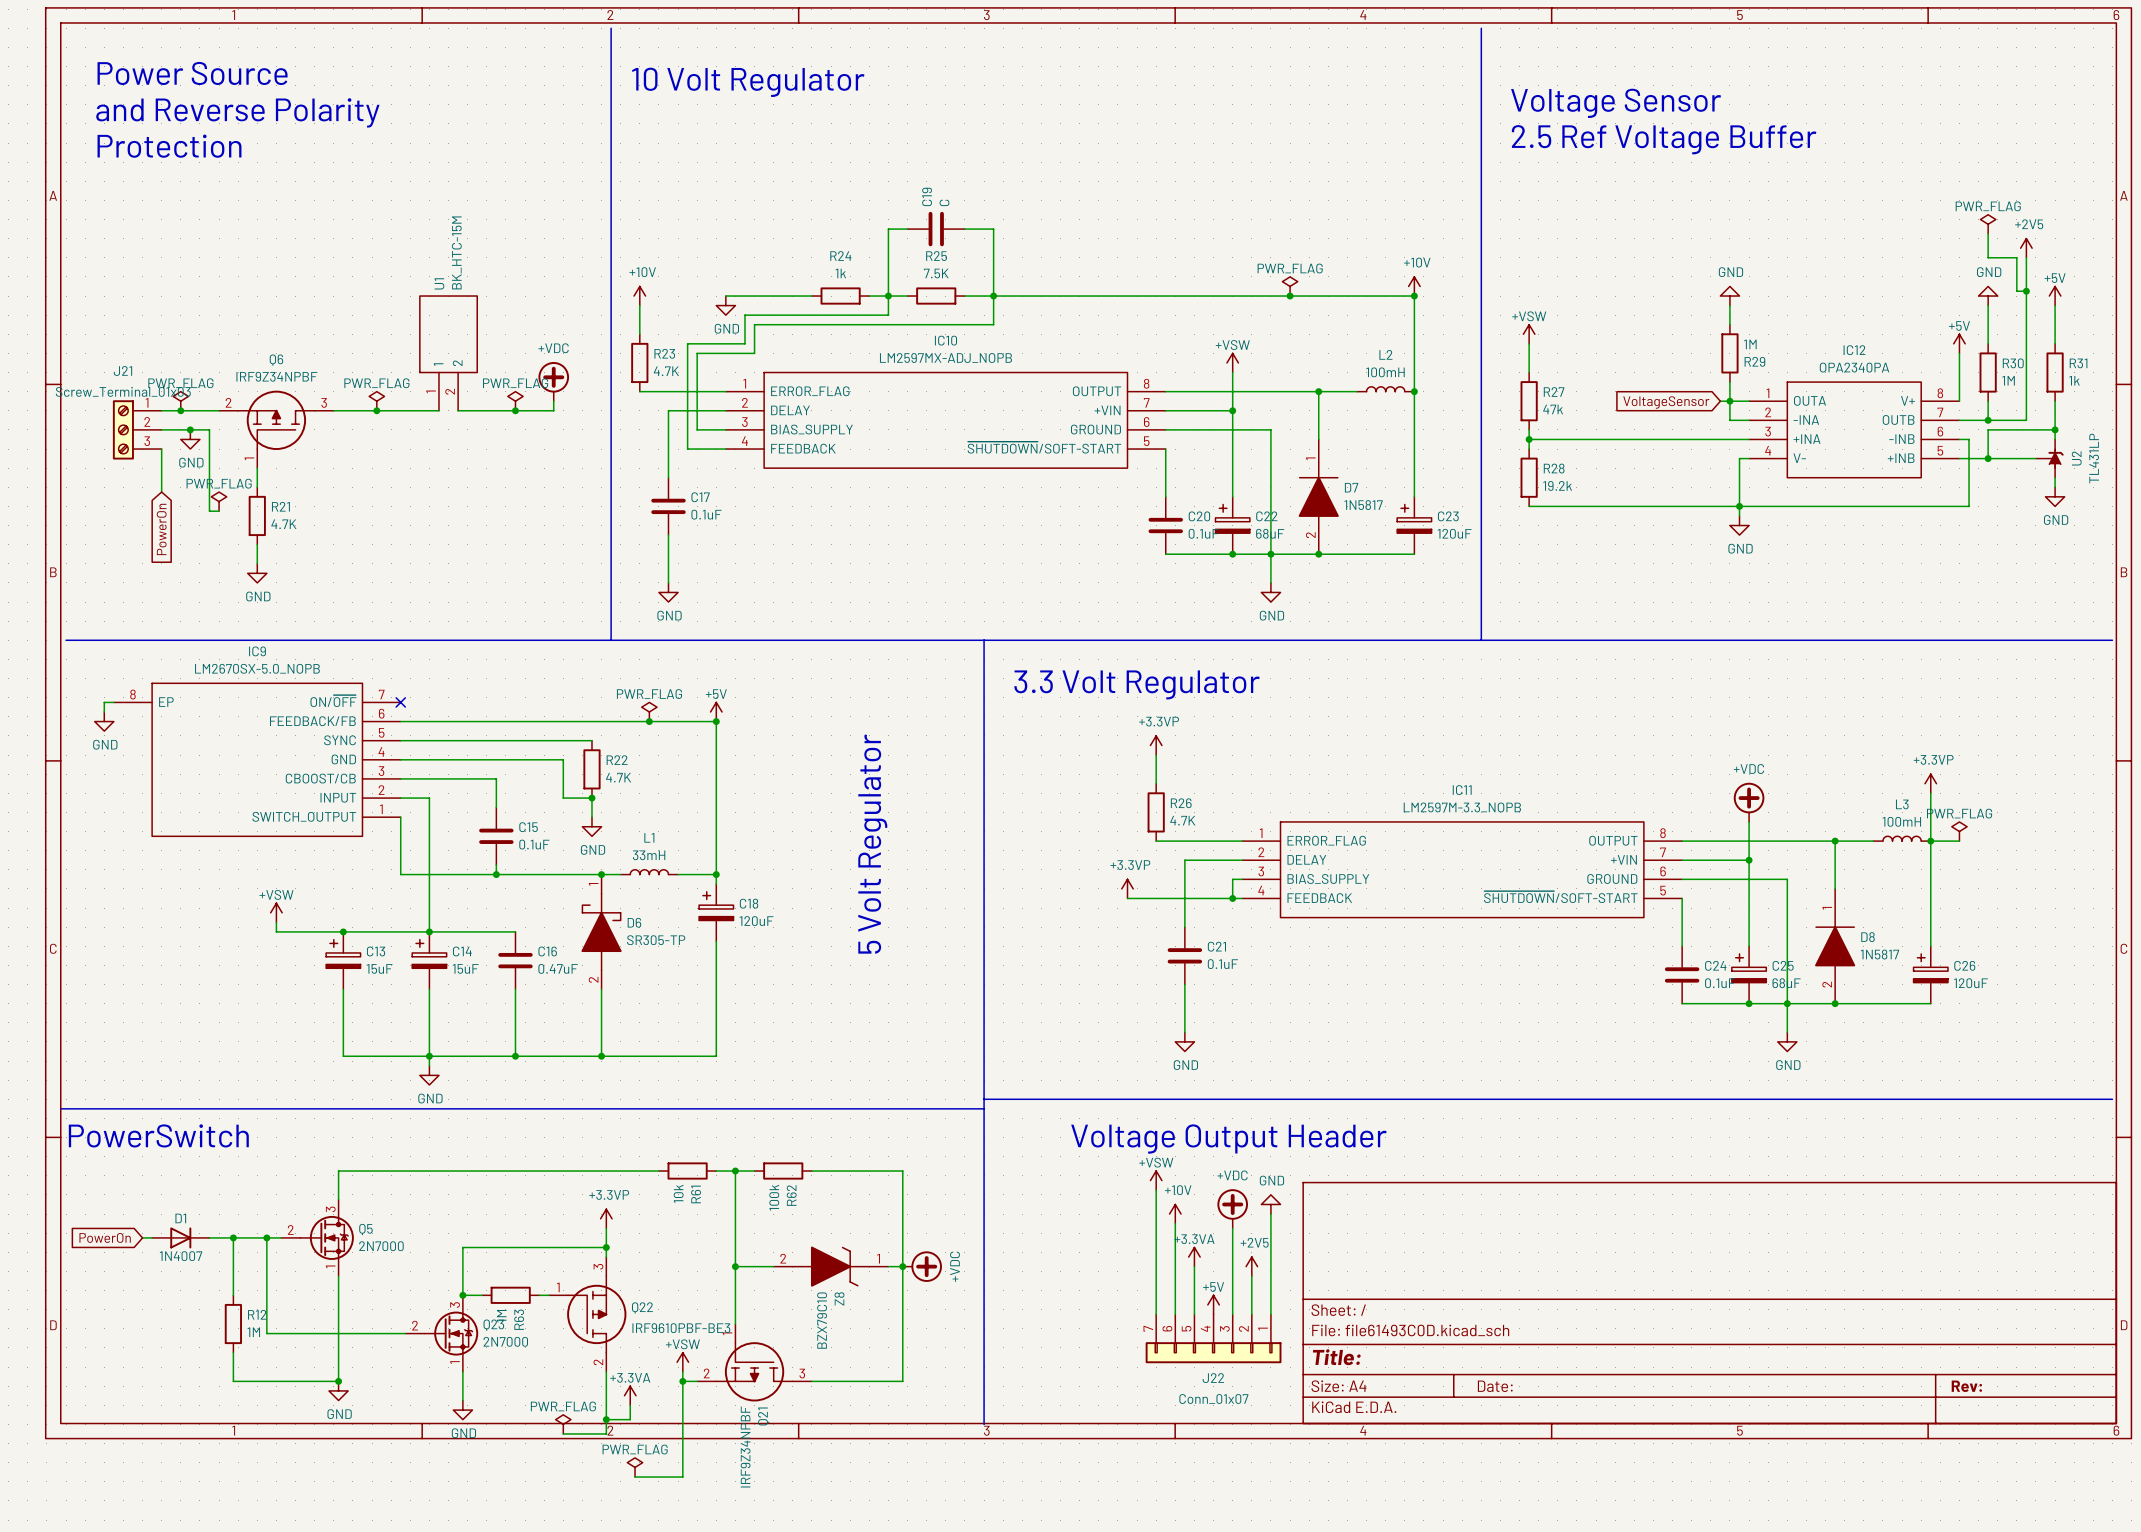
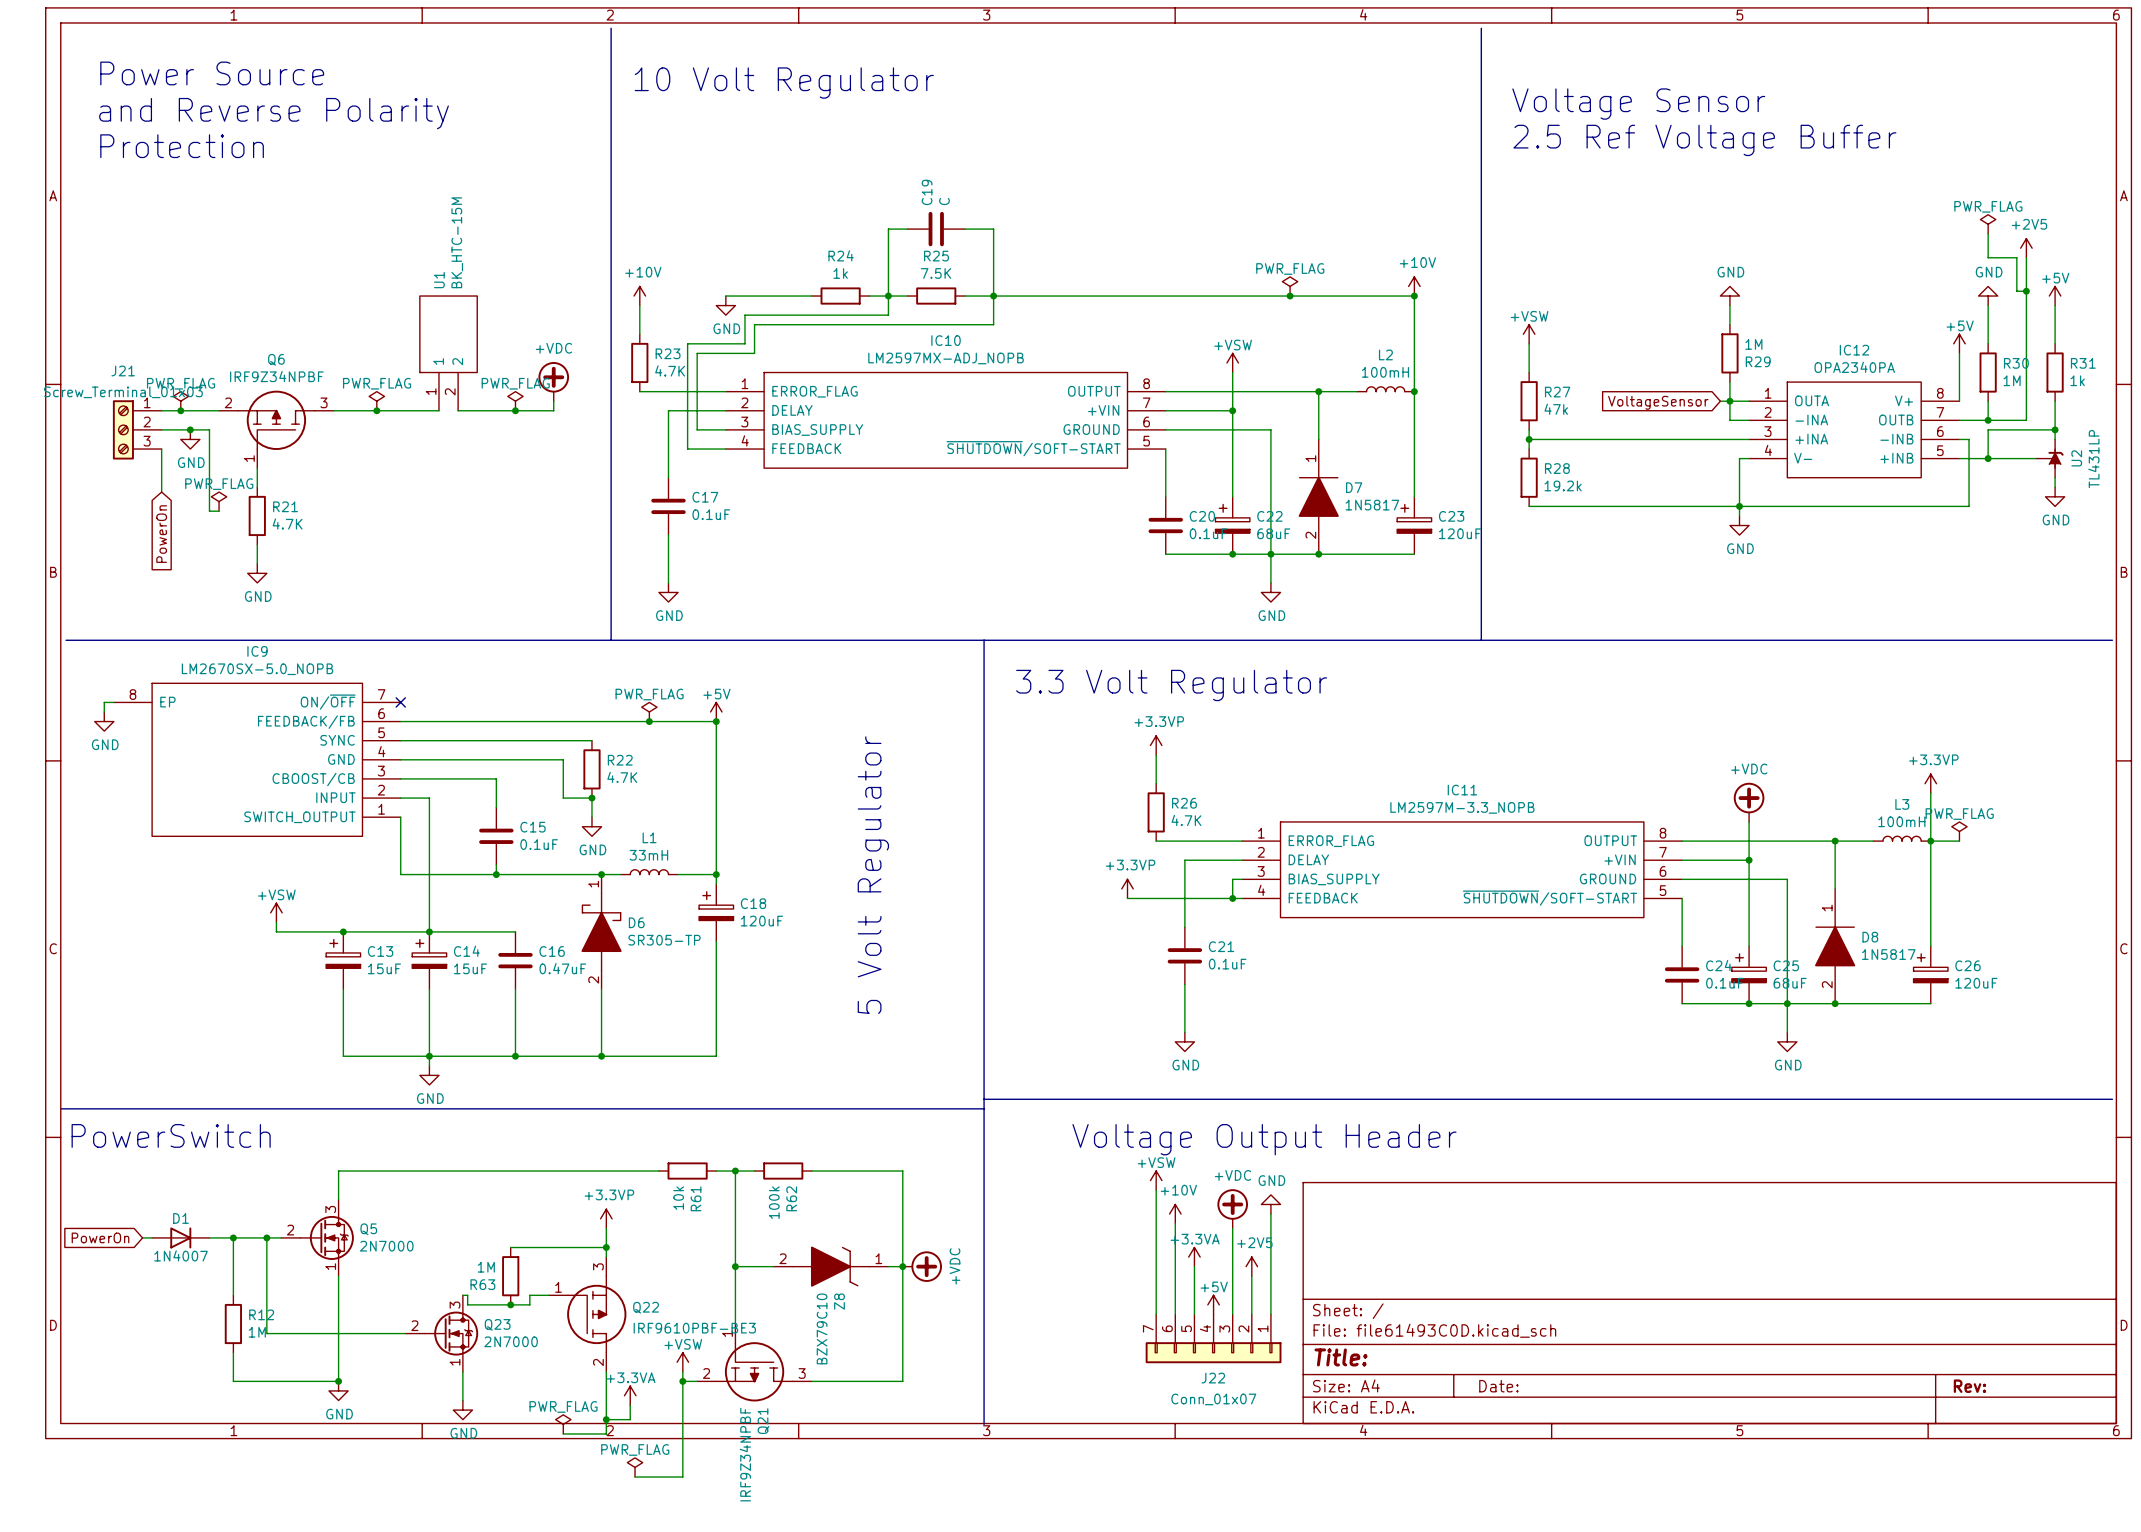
wire: (510, 1247) (462, 1247) (462, 1295) -> none
junction: (462, 1295) -> none
wire: (467, 1295) (482, 1295) -> (467, 1295) (467, 1304) (529, 1304) (529, 1295) (539, 1295)
R63 rotation: 0° (510, 1295) -> 90° clockwise (510, 1276)
junction: none -> (510, 1304)

